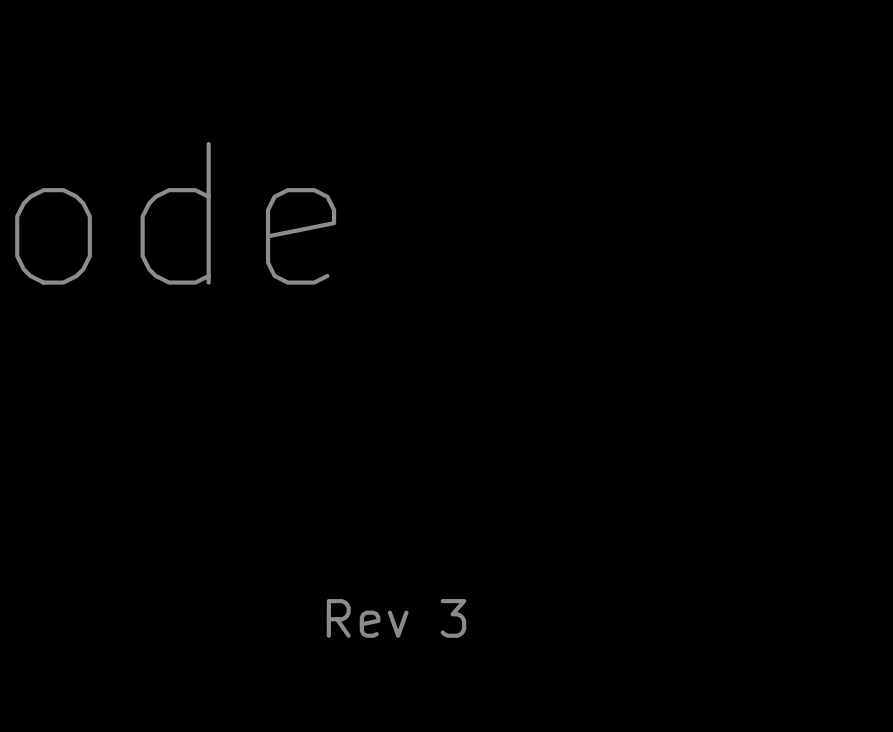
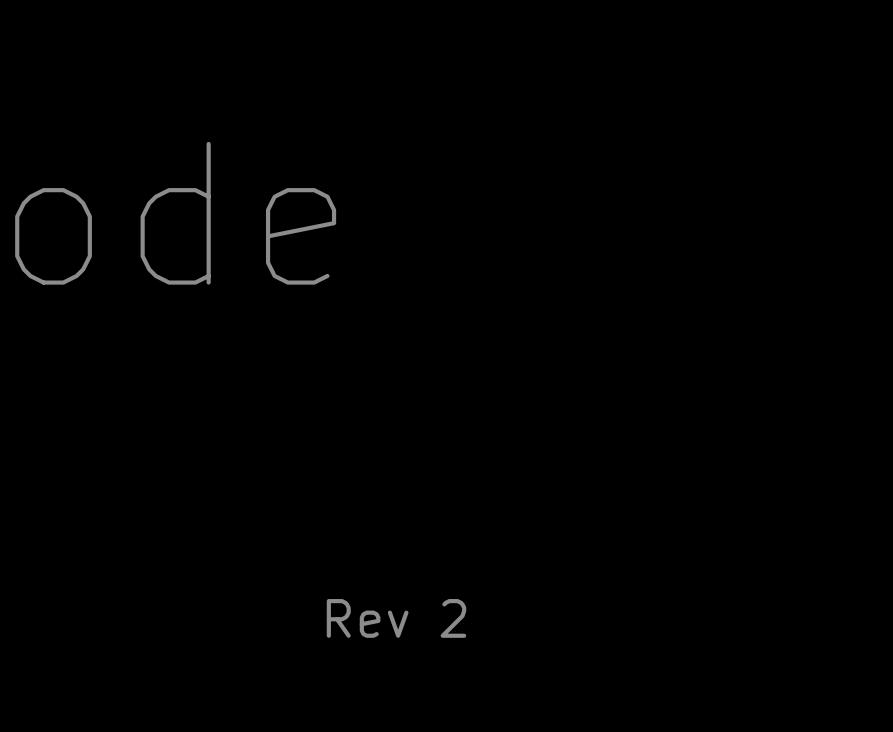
text: Rev 3 (396, 618) -> Rev 2 (396, 618)

